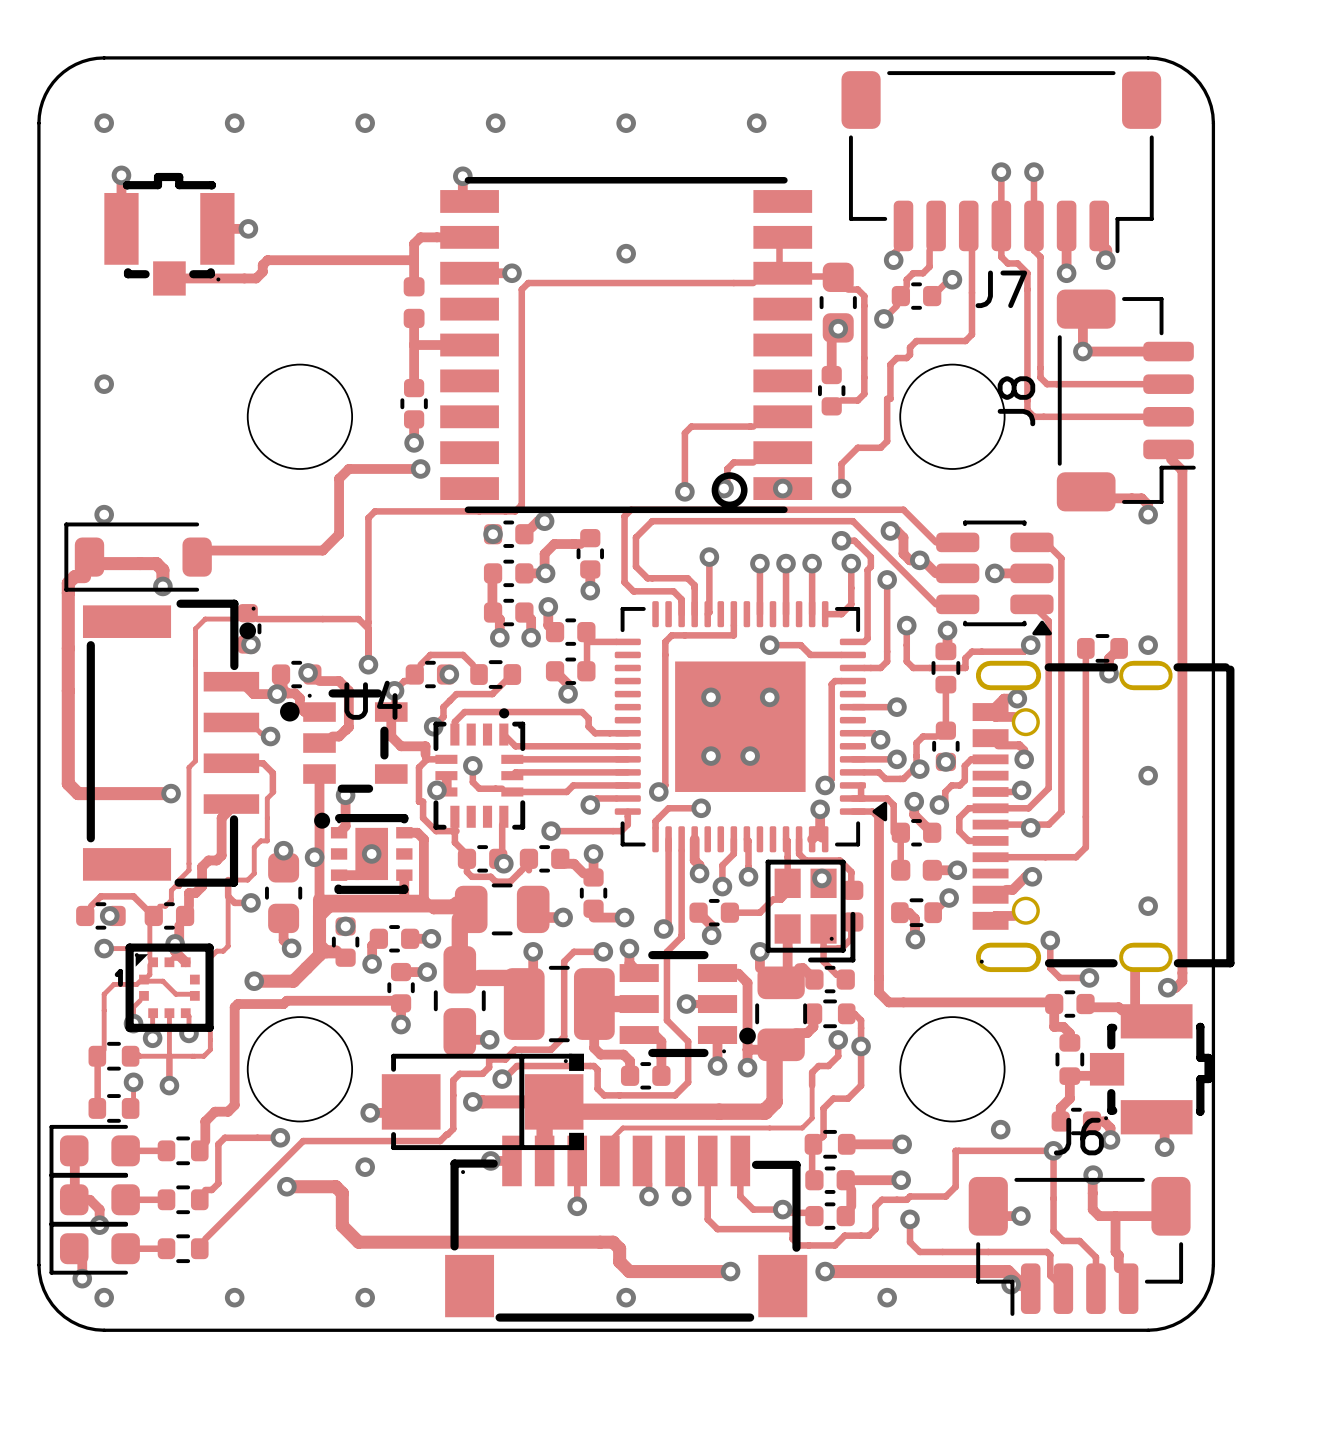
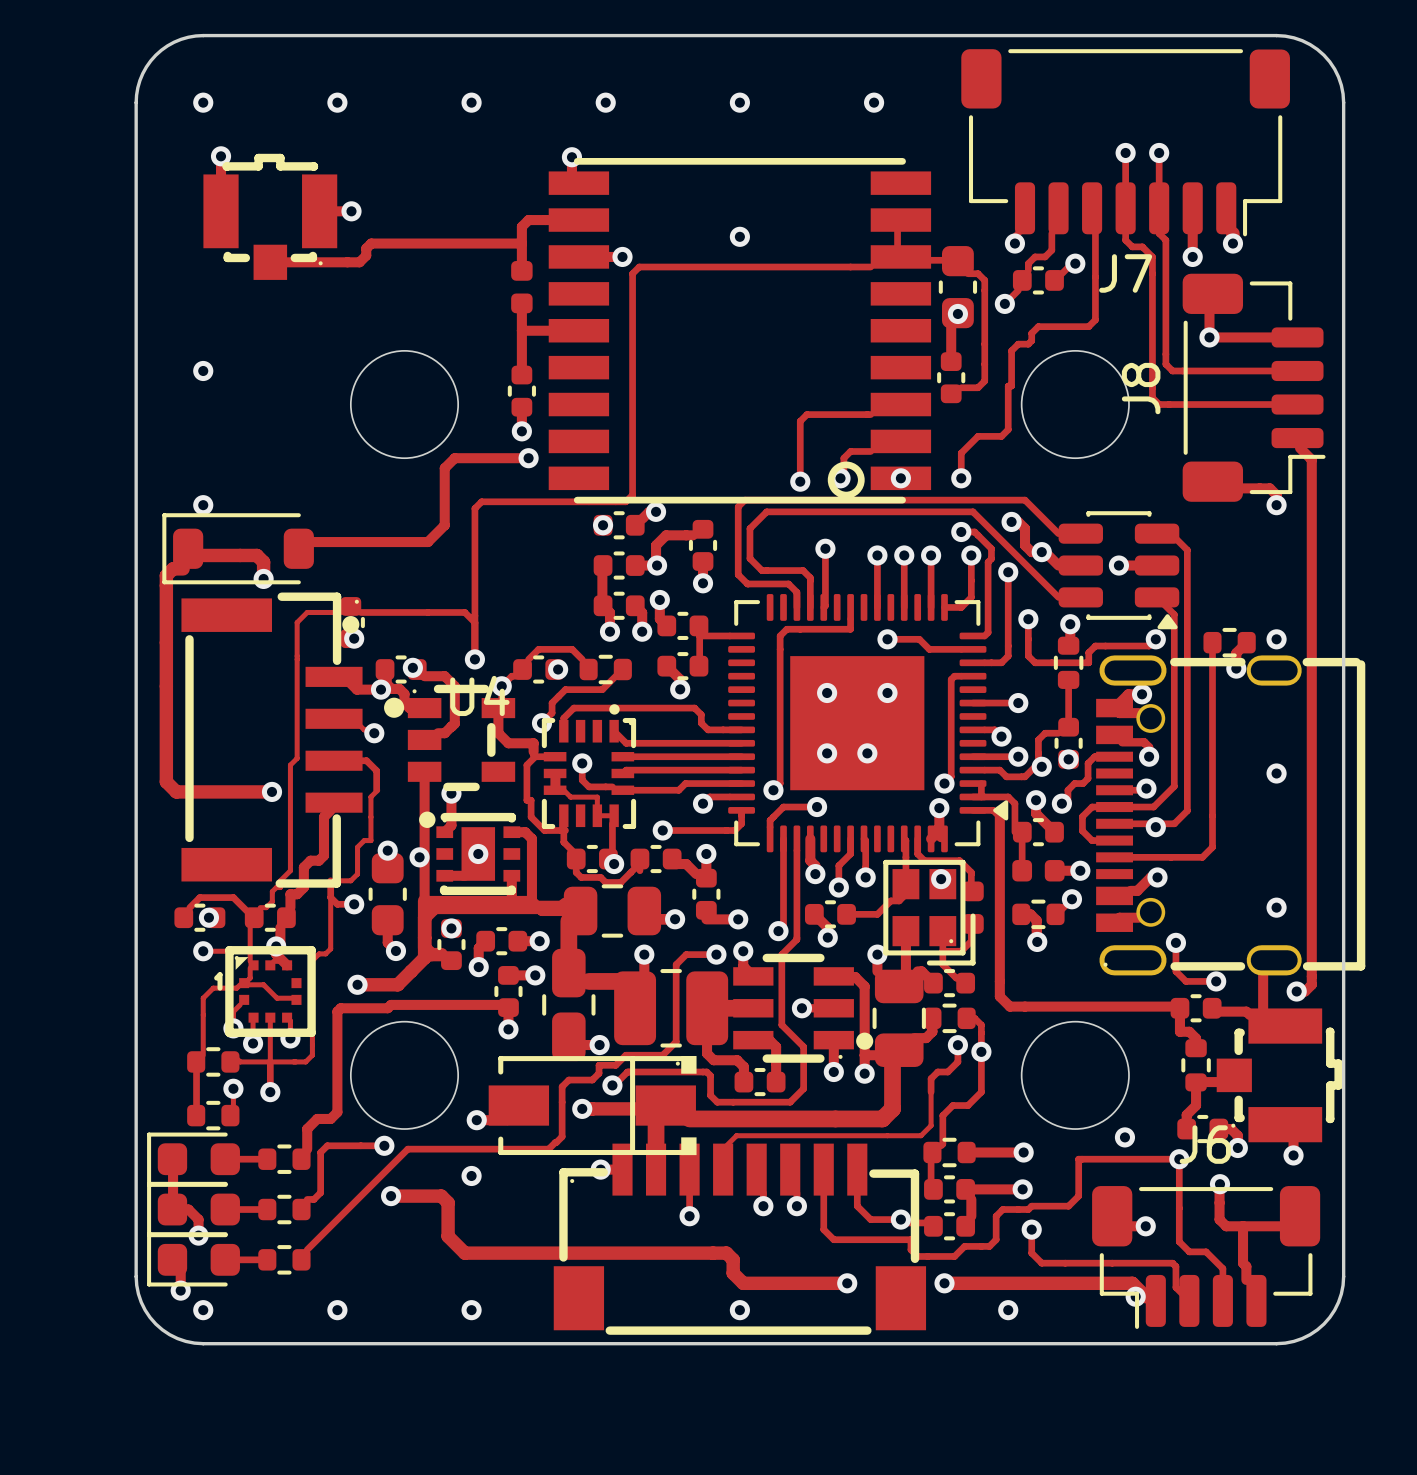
via: (436, 790) -> none
track: none -> (563, 790) (570, 797) (597, 797) (597, 815) (614, 815)
part footprint: [381, 1053, 584, 1151] -> [488, 1055, 697, 1156]

